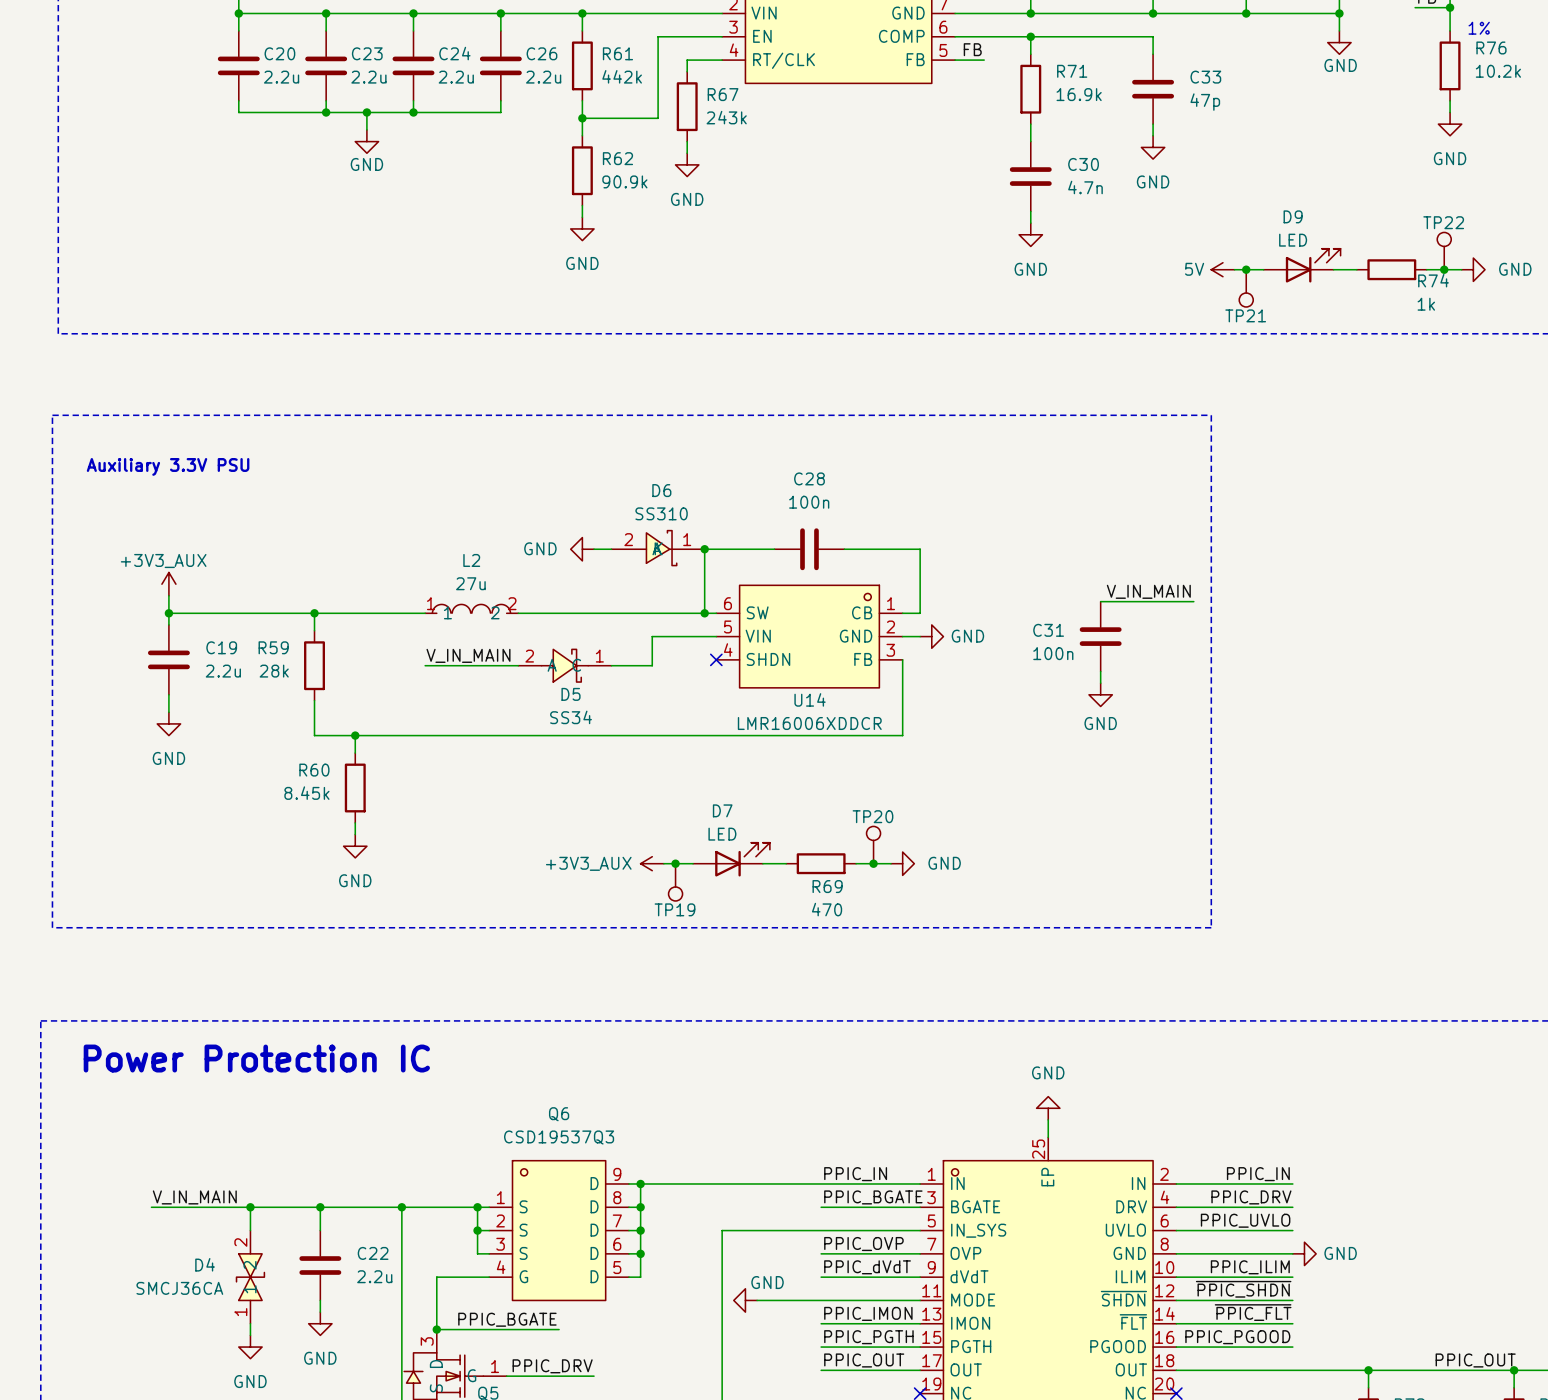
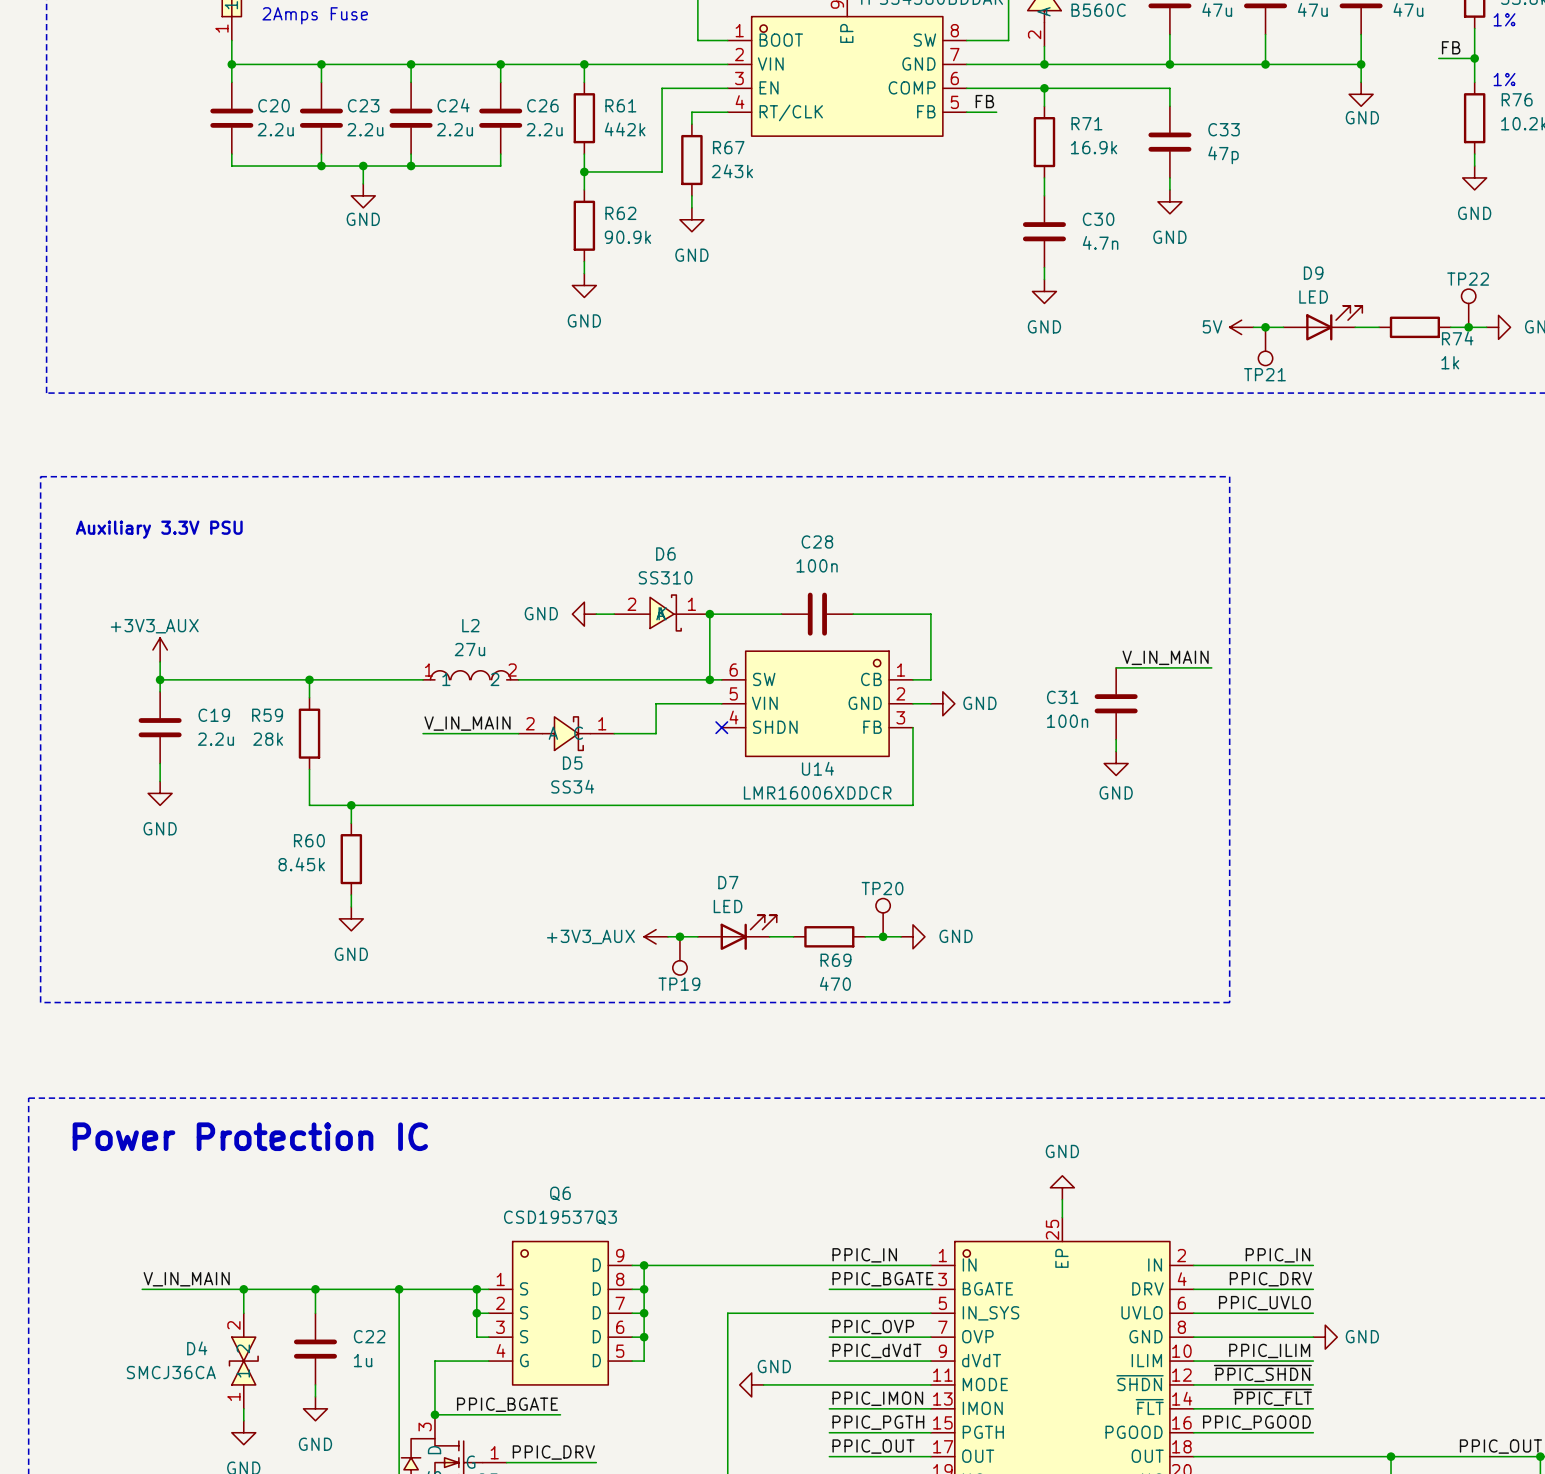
C22 value: 2.2u (374, 1276) -> 1u (363, 1360)

